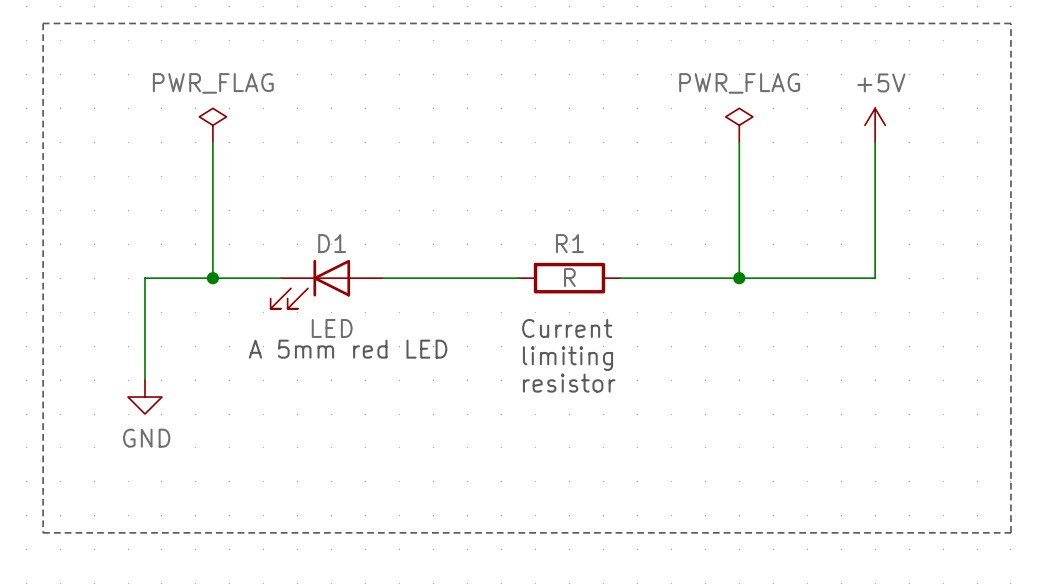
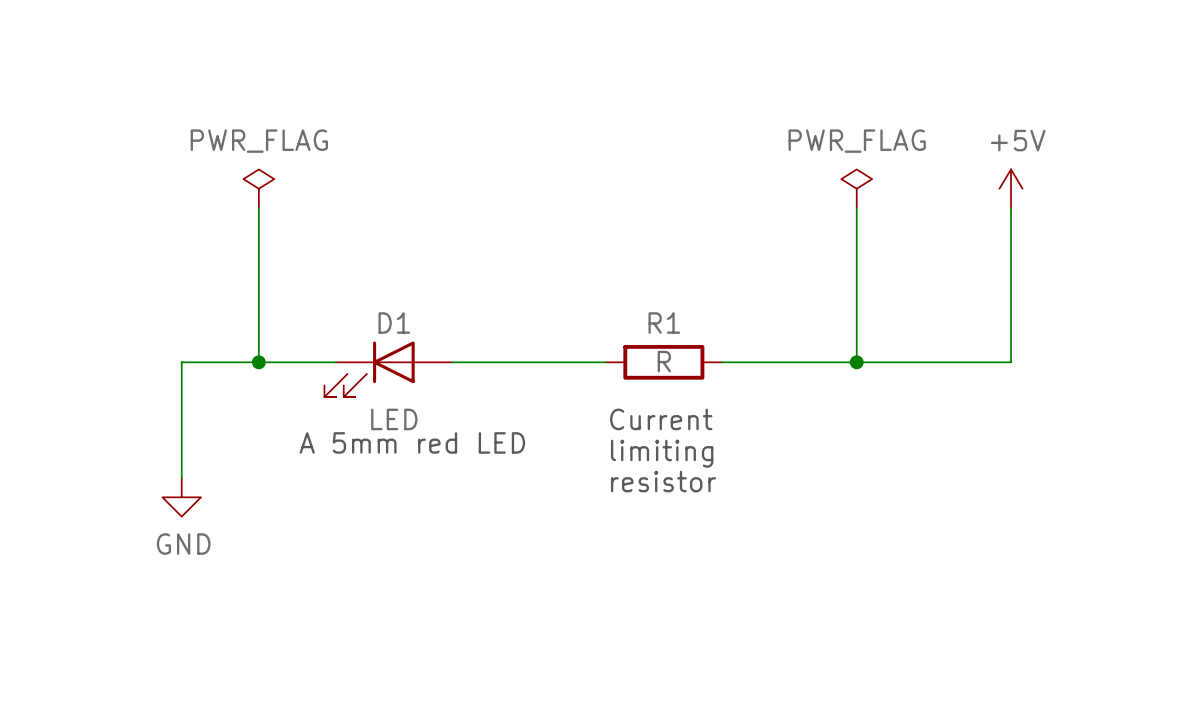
line: (43, 23) (43, 532) (1010, 532) (1010, 23) (43, 23) -> none

